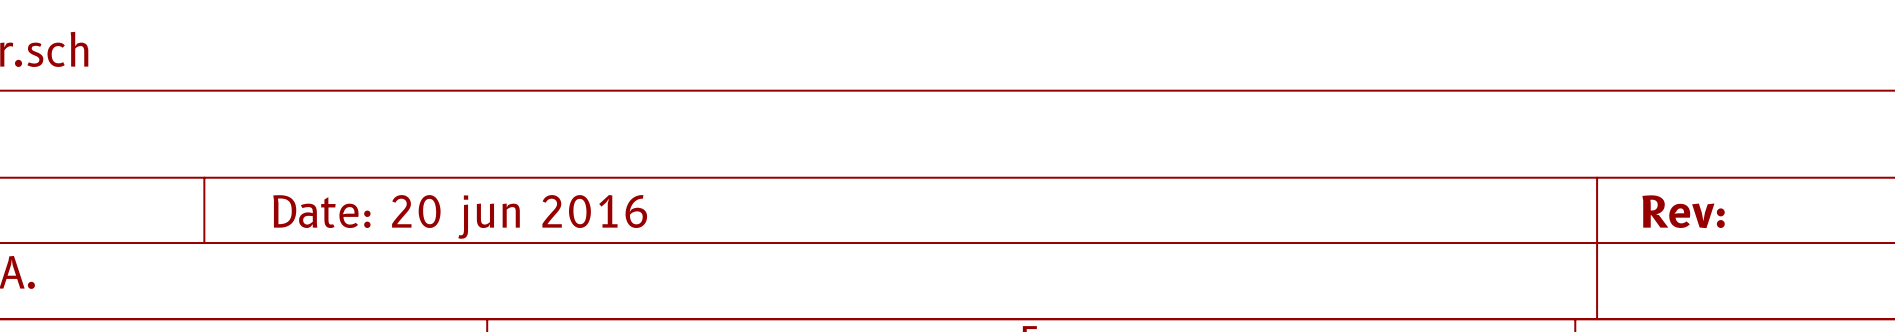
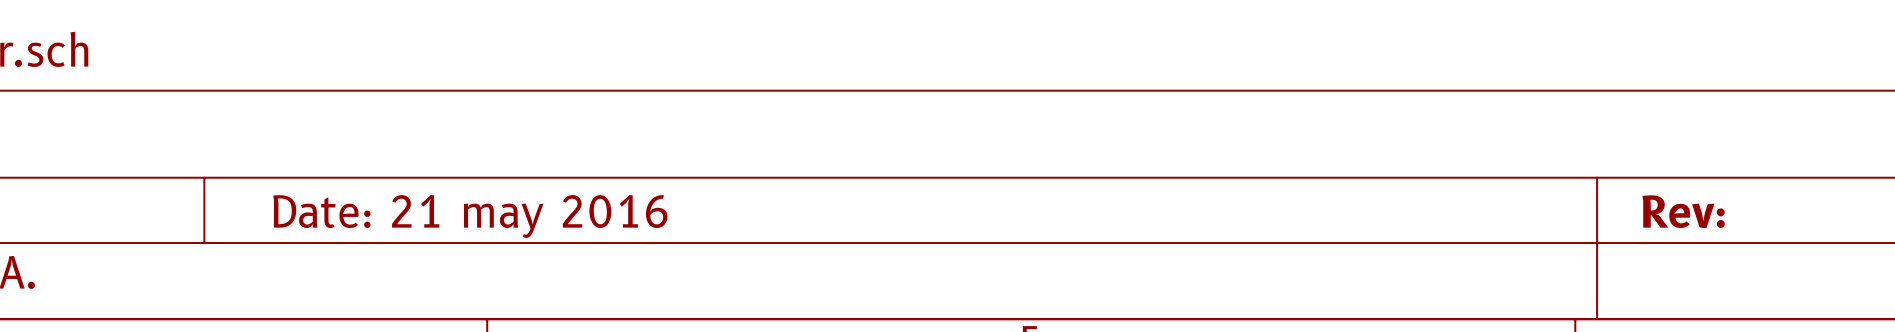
title block: Date: 20 jun 2016 (460, 216) -> Date: 21 may 2016 (470, 216)

